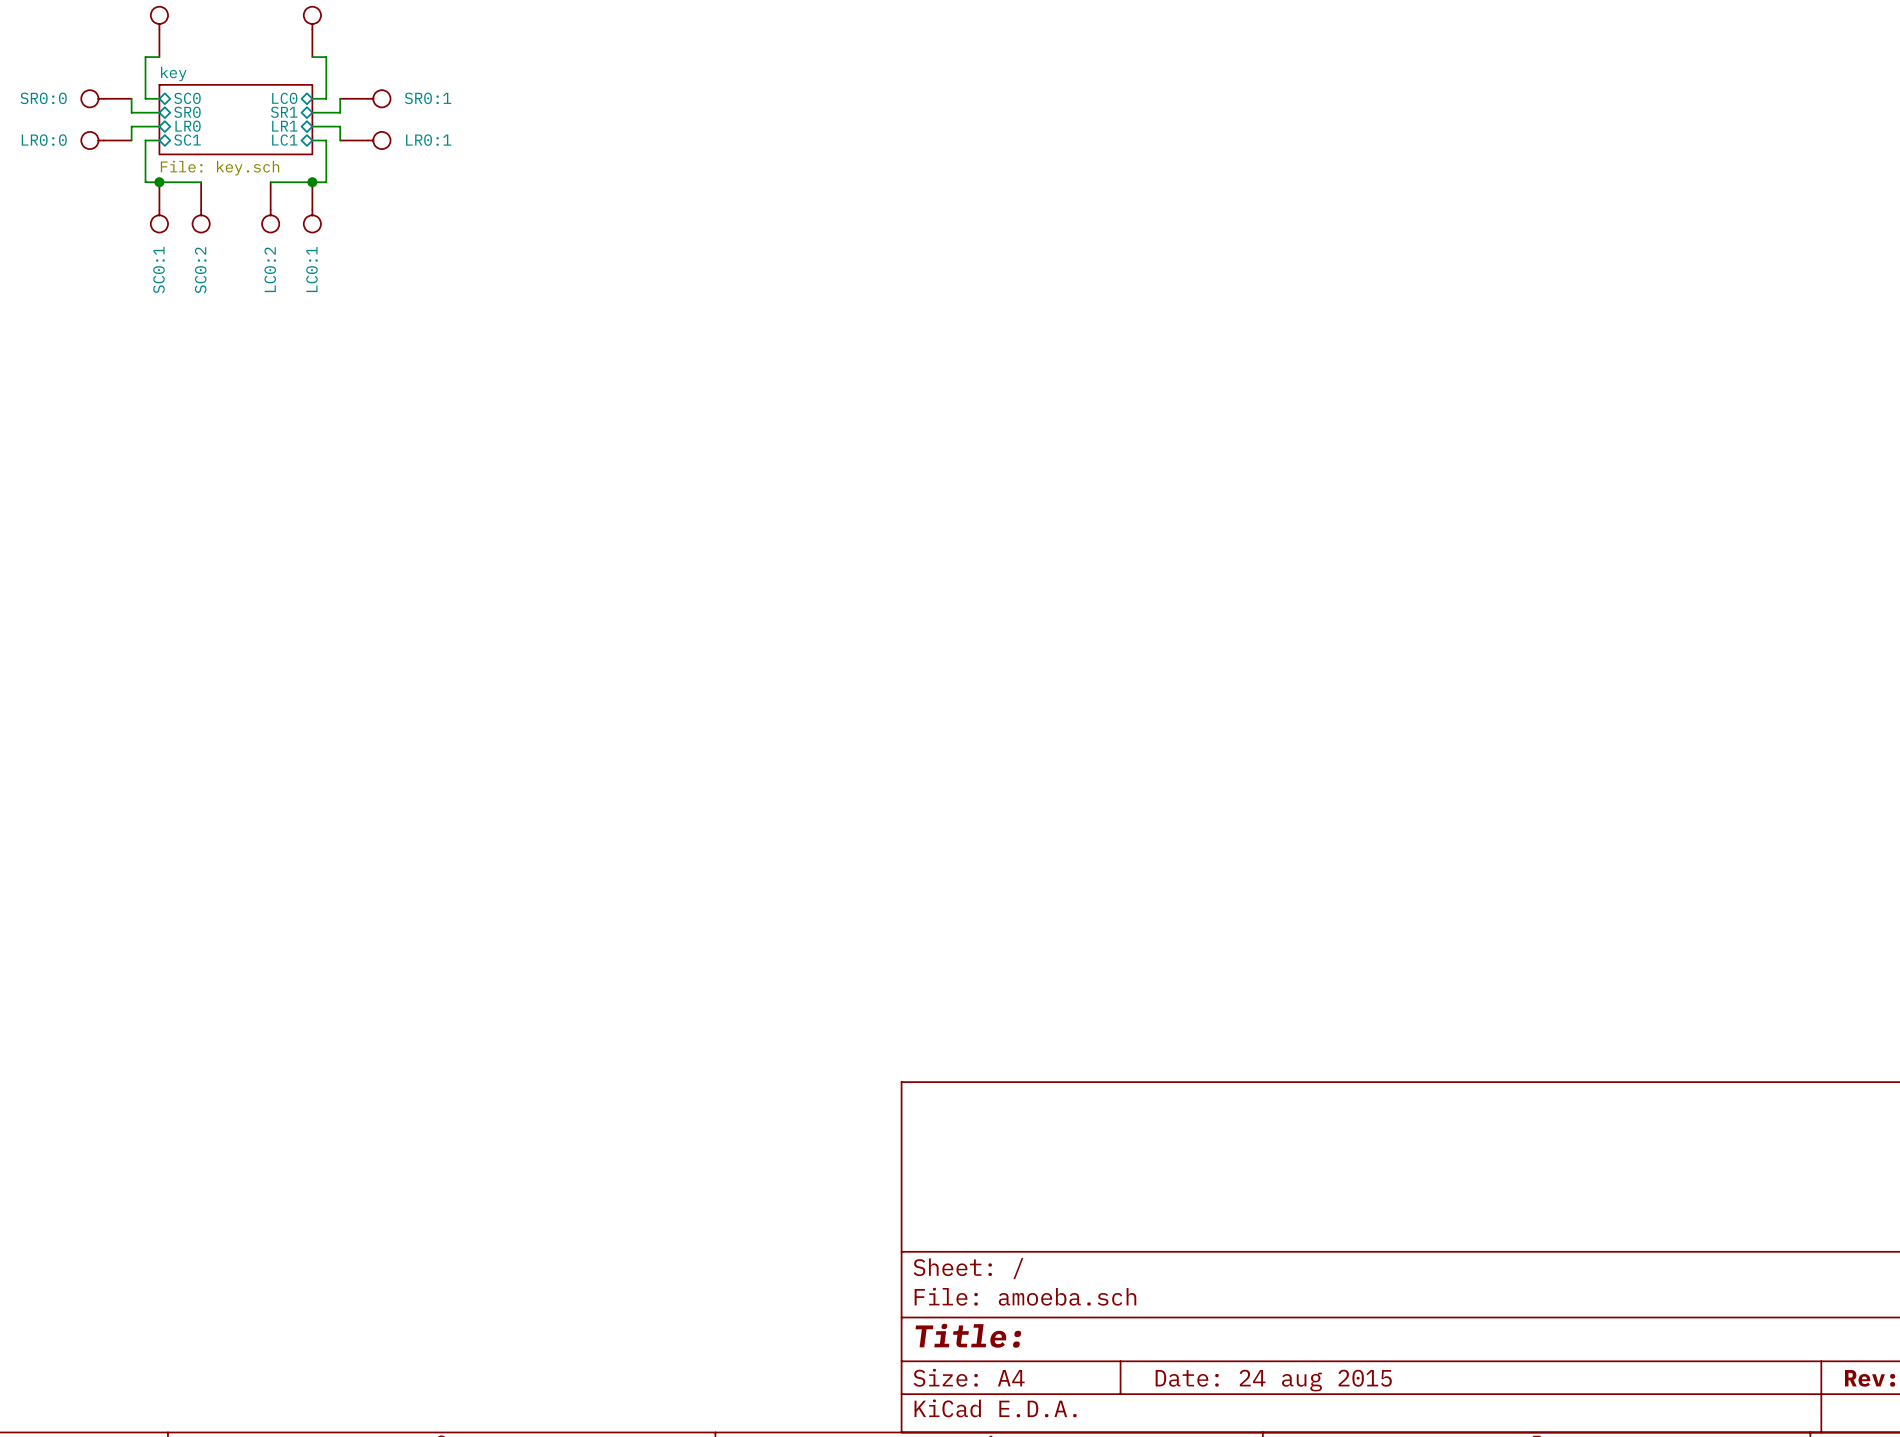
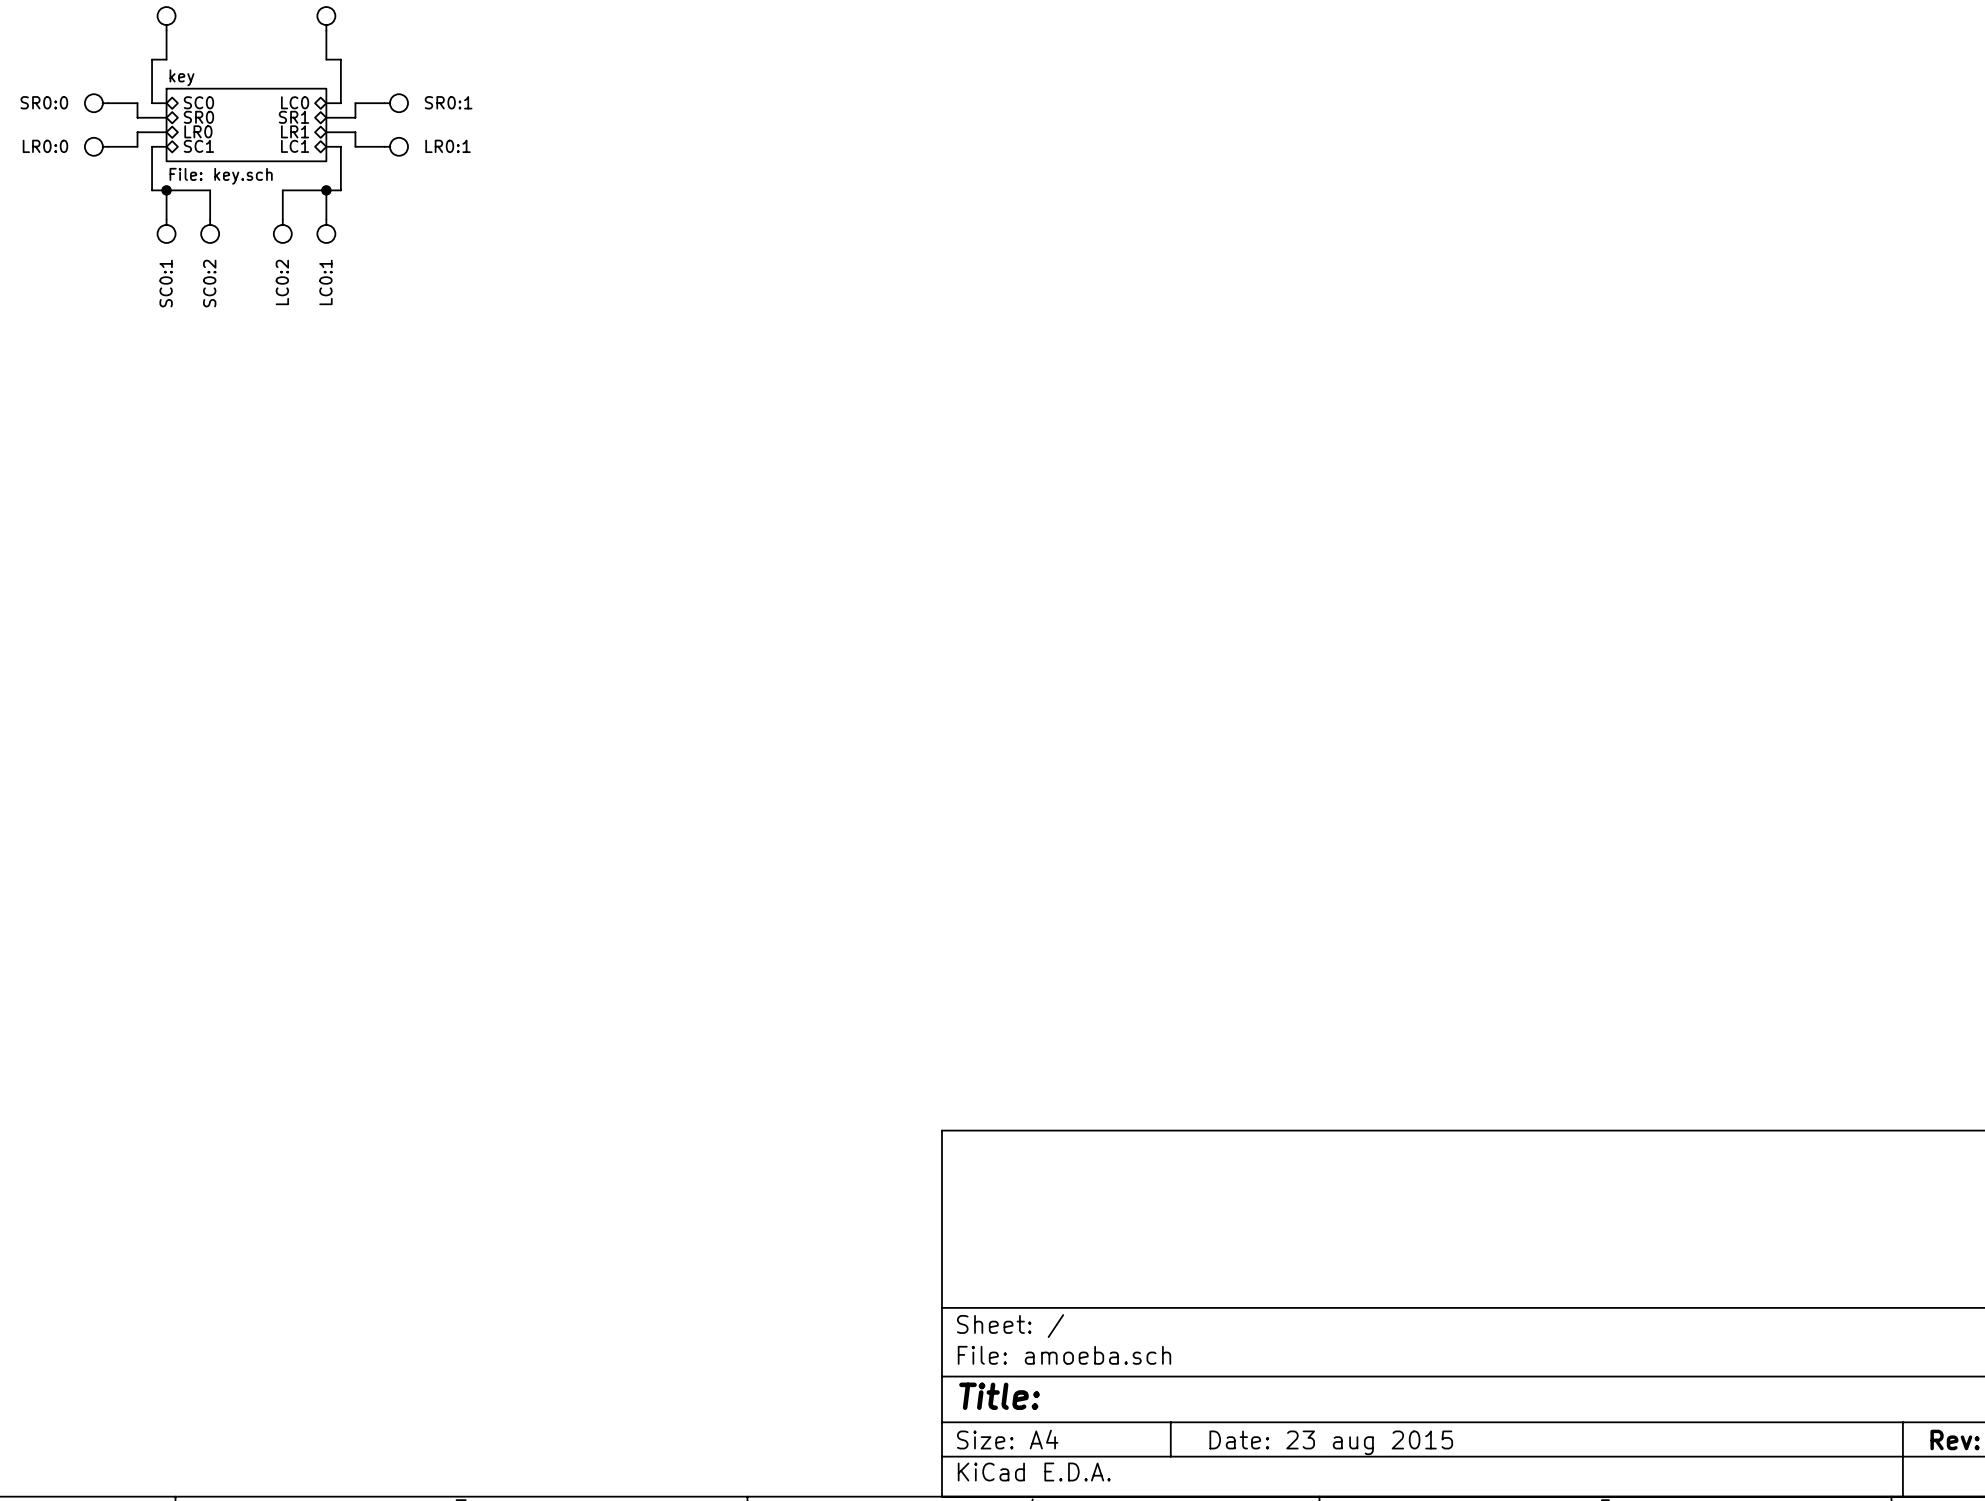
title block: Date: 24 aug 2015 (1273, 1380) -> Date: 23 aug 2015 (1331, 1442)

